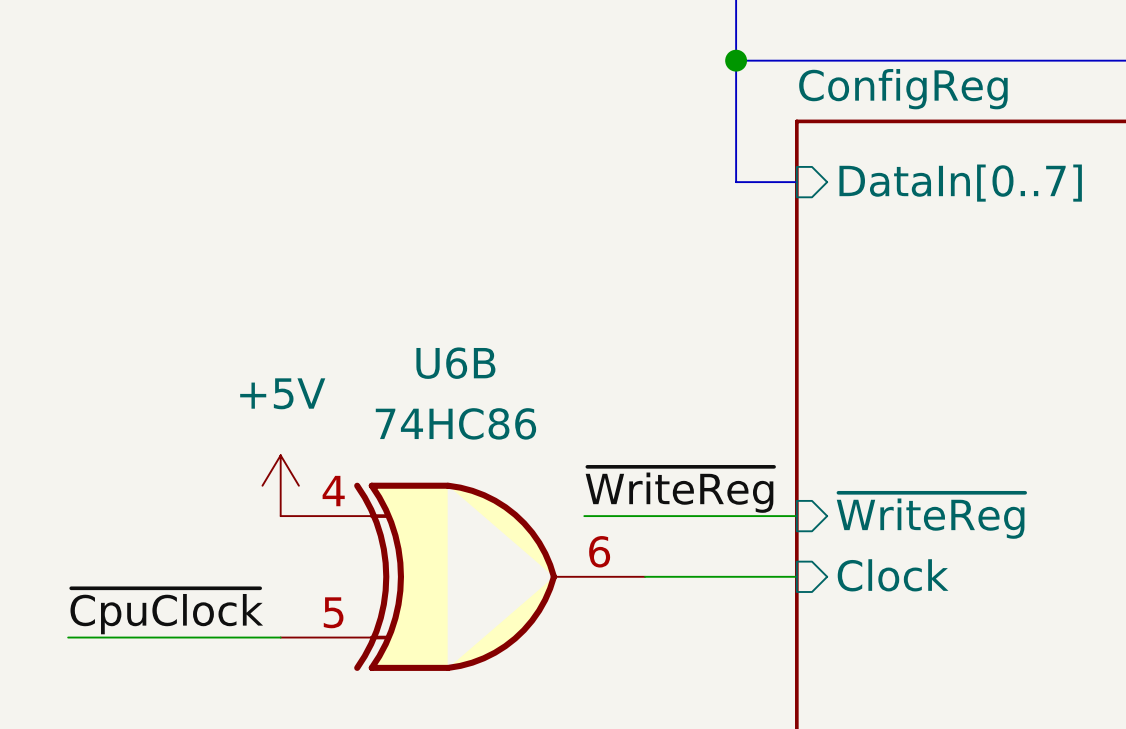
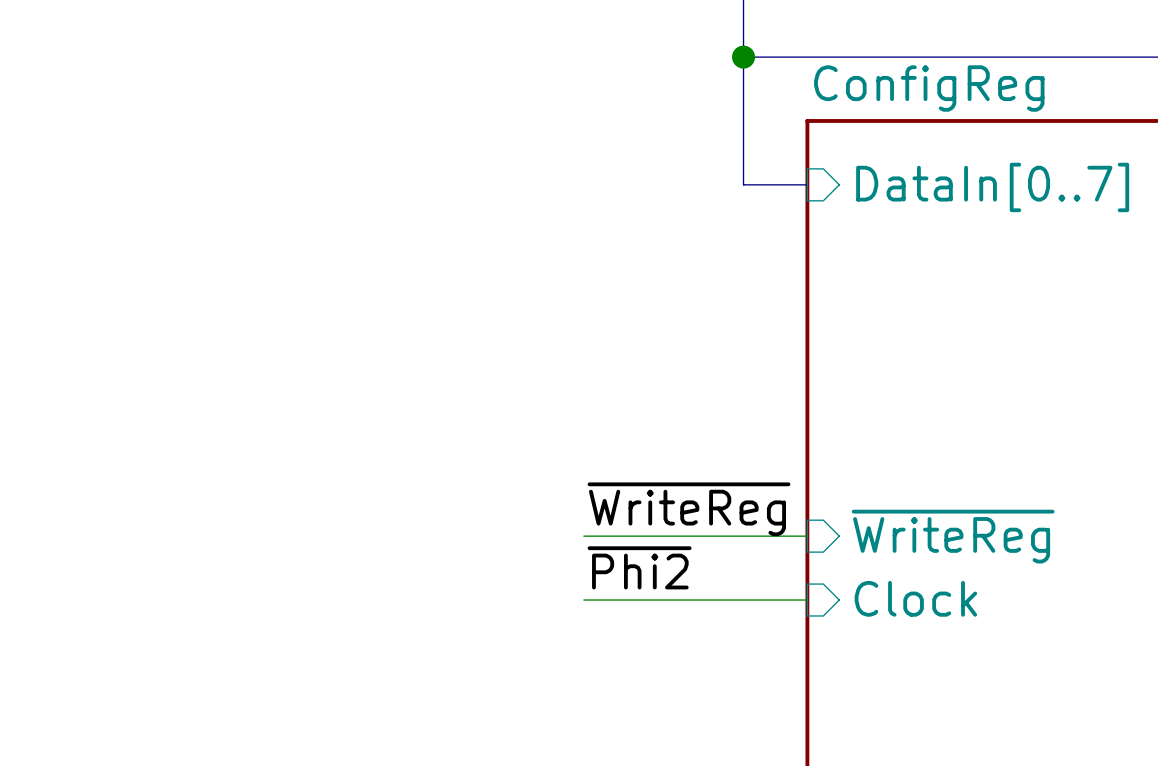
power symbol: +5V (280, 485) -> none
label: none -> ~{Phi2} (639, 567)
U6B: 74HC86 (462, 576) -> none
label: ~{CpuClock} (166, 611) -> none
wire: (68, 637) (280, 637) -> none

